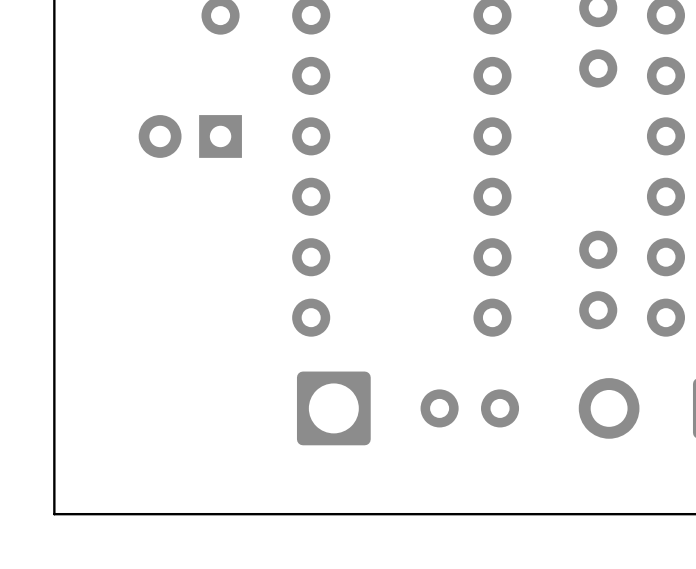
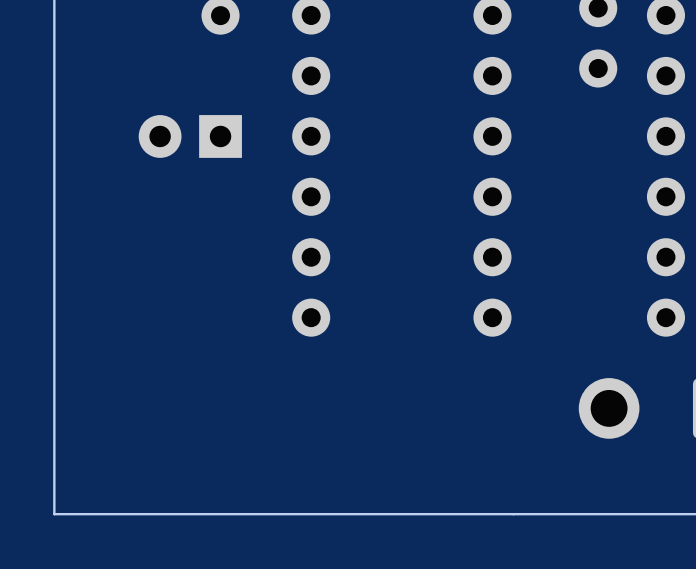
part: (598, 280) -> none
part: (333, 408) -> none
part: (469, 408) -> none

